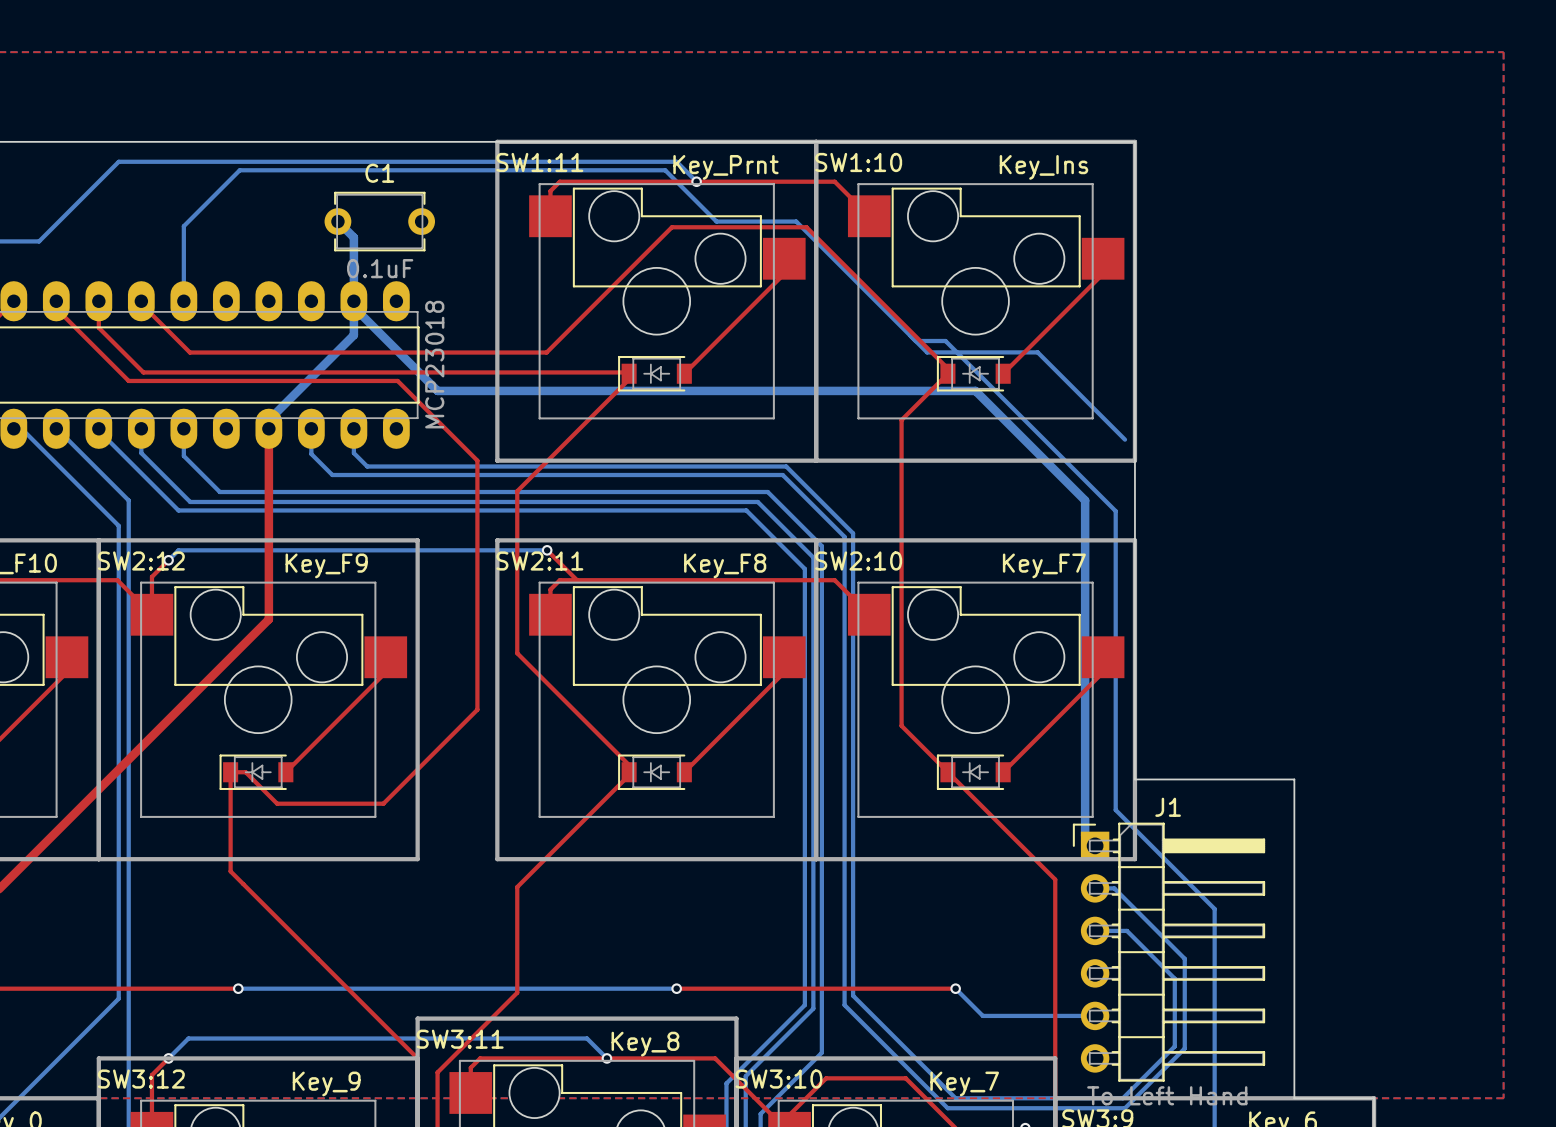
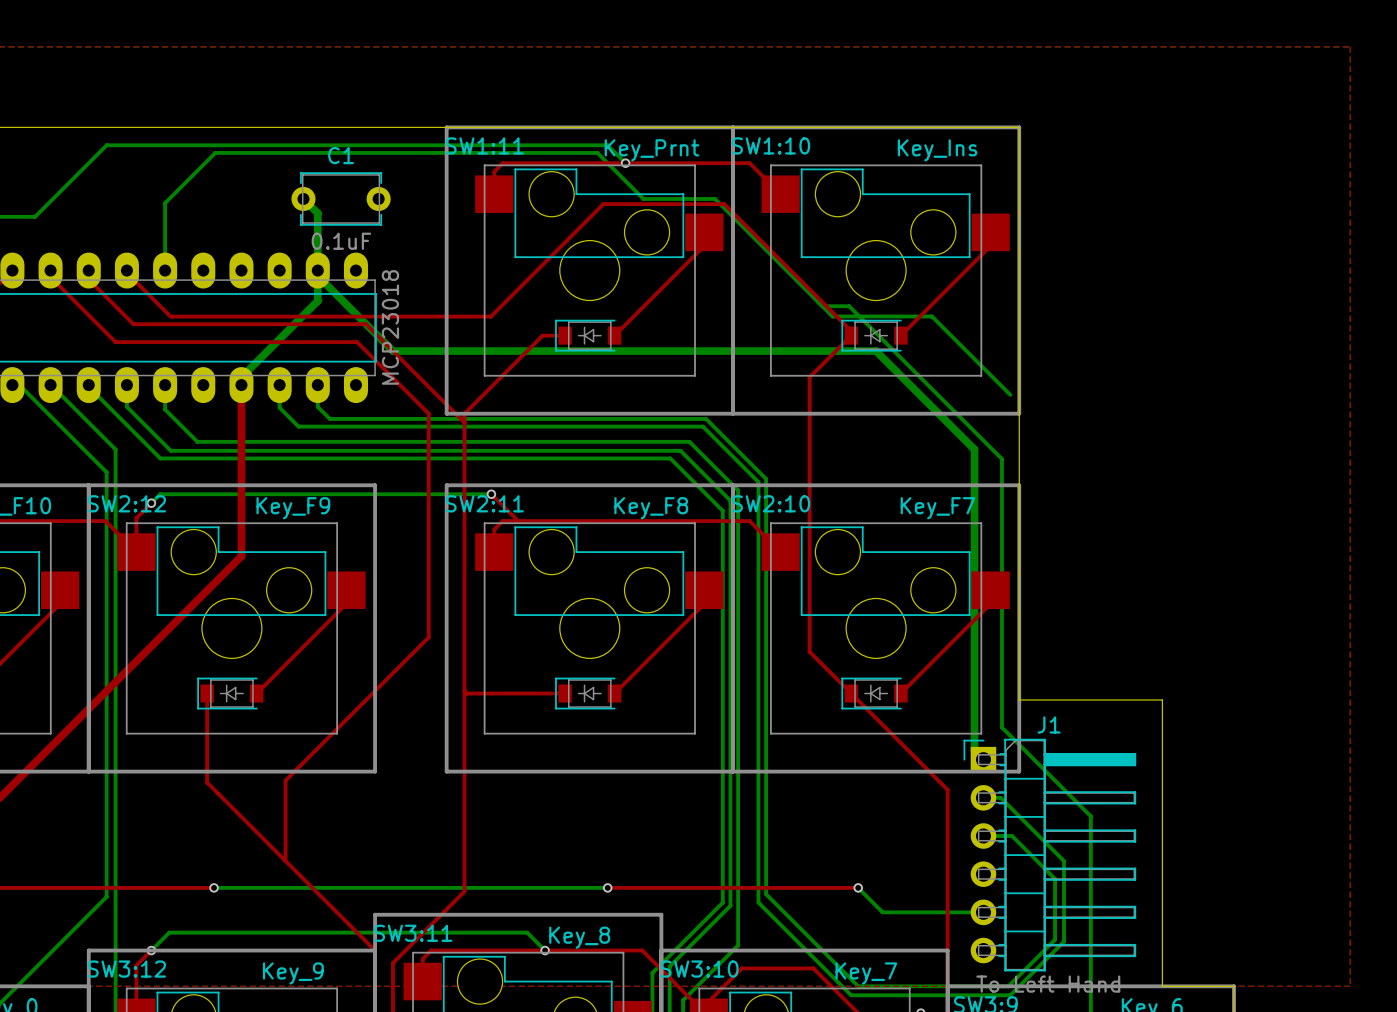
top track: (98, 311) (98, 327) (143, 372) (627, 372) (629, 379) (517, 491) -> (88, 279) (133, 324) (366, 324) (464, 422)
top track: none -> (564, 335) (542, 335) (464, 413) (464, 441)
top track: (517, 653) (629, 765) (629, 775) (517, 887) -> (464, 586) (464, 796)
top track: none -> (464, 691) (467, 693) (564, 693)
top track: (230, 772) (245, 772) (277, 803) (383, 803) -> (285, 861) (285, 780) (344, 721)

